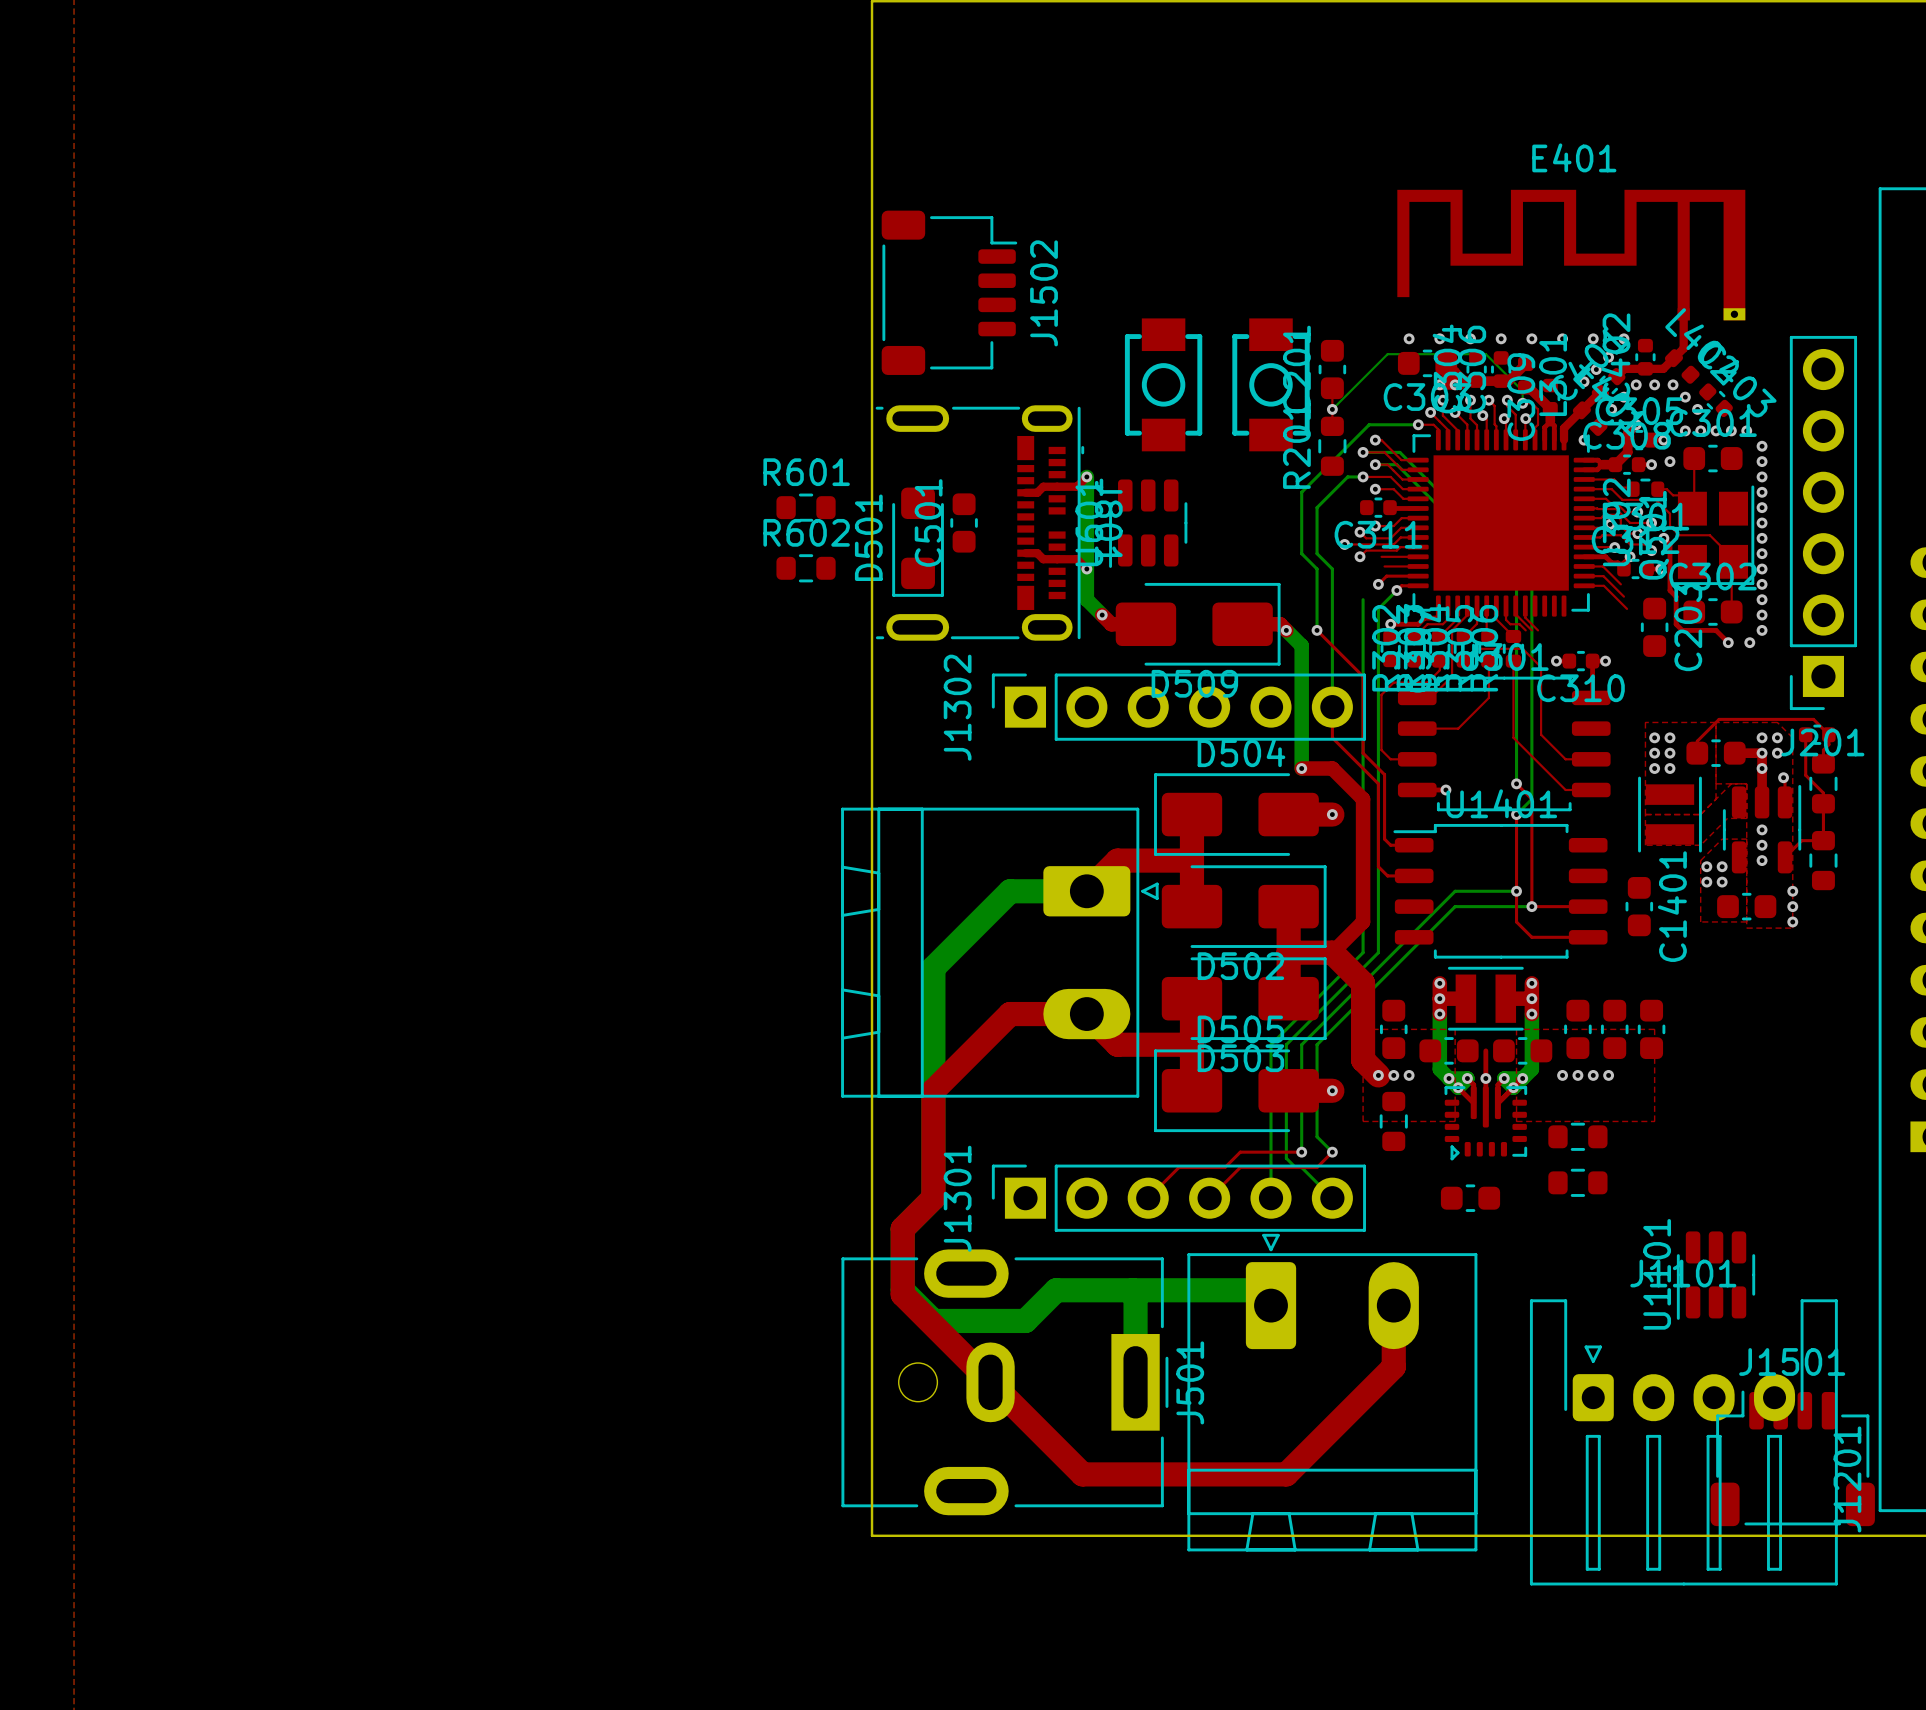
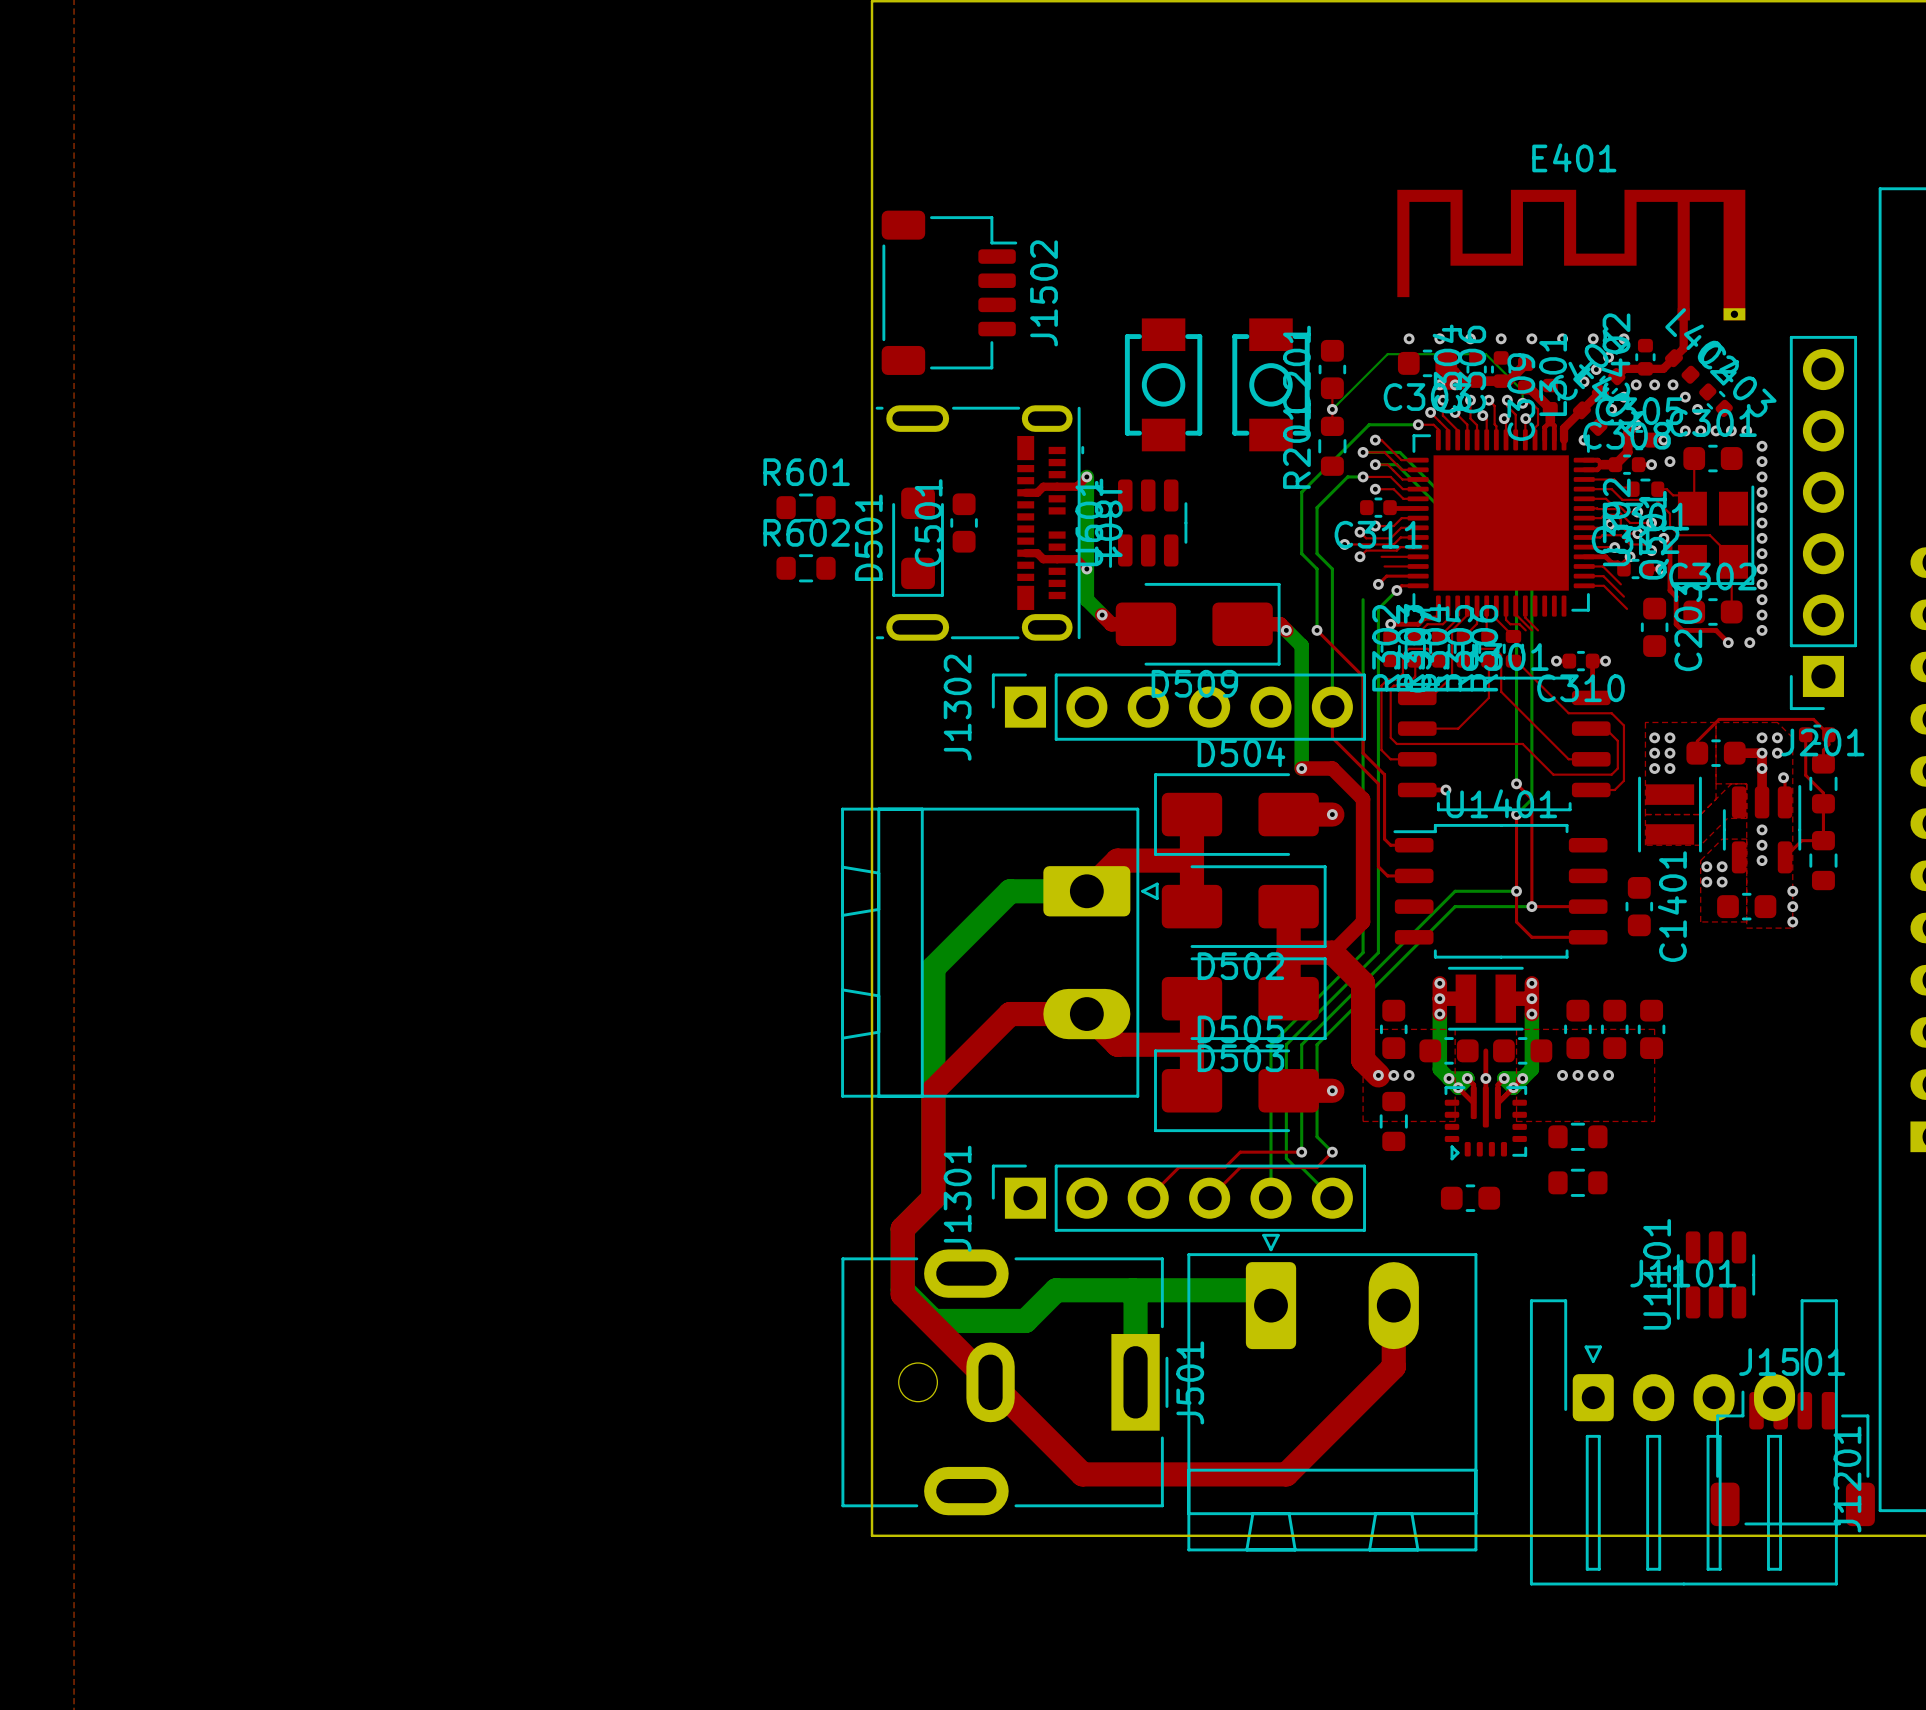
top track: (1495, 648) (1522, 648) (1541, 667) (1541, 734) (1565, 759) (1568, 759) -> (1495, 648) (1501, 654) (1501, 691) (1568, 759)
top track: none -> (1415, 661) (1415, 676) (1406, 685) (1393, 685) (1390, 688) (1390, 737) (1396, 743) (1522, 743) (1553, 774) (1611, 774) (1617, 768) (1617, 740) (1605, 728) (1591, 728)
top track: (1439, 661) (1439, 670) (1427, 682) (1393, 682) (1381, 694) -> (1439, 661) (1427, 648) (1409, 648) (1402, 654) (1402, 673) (1396, 679) (1387, 679) (1381, 685) (1381, 694)
top track: (1513, 661) (1513, 737) (1565, 789) (1591, 789) -> (1513, 661) (1516, 661) (1568, 713) (1611, 713) (1623, 725) (1623, 780) (1614, 789) (1591, 789)

